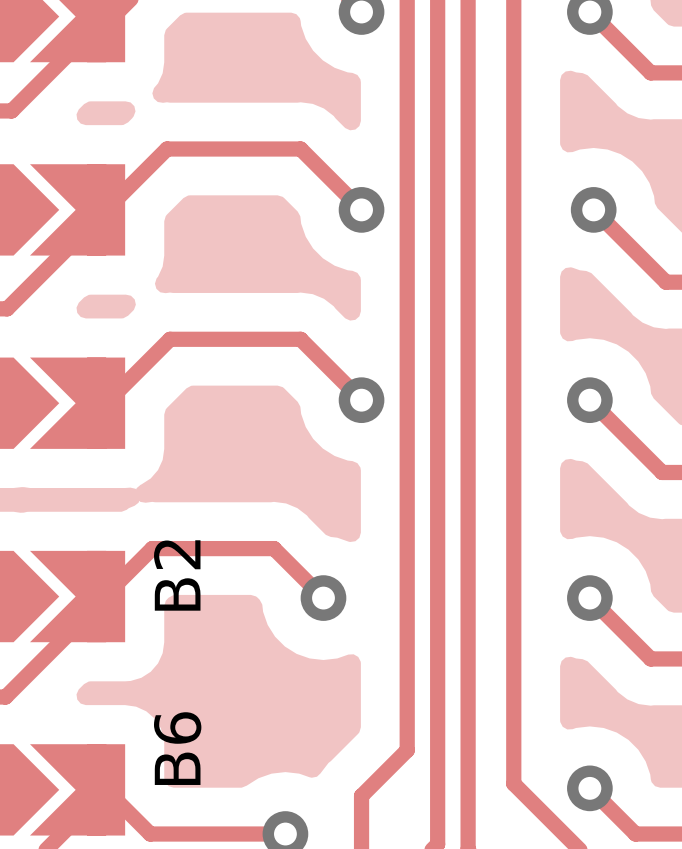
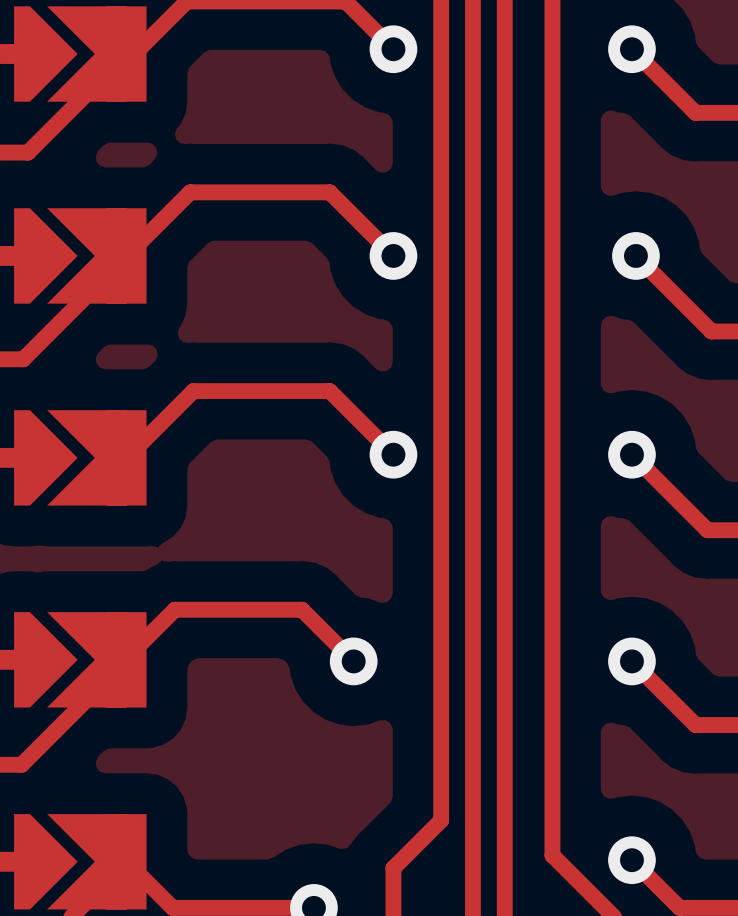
part text: B2 (177, 575) -> none
part text: B6 (177, 748) -> none

